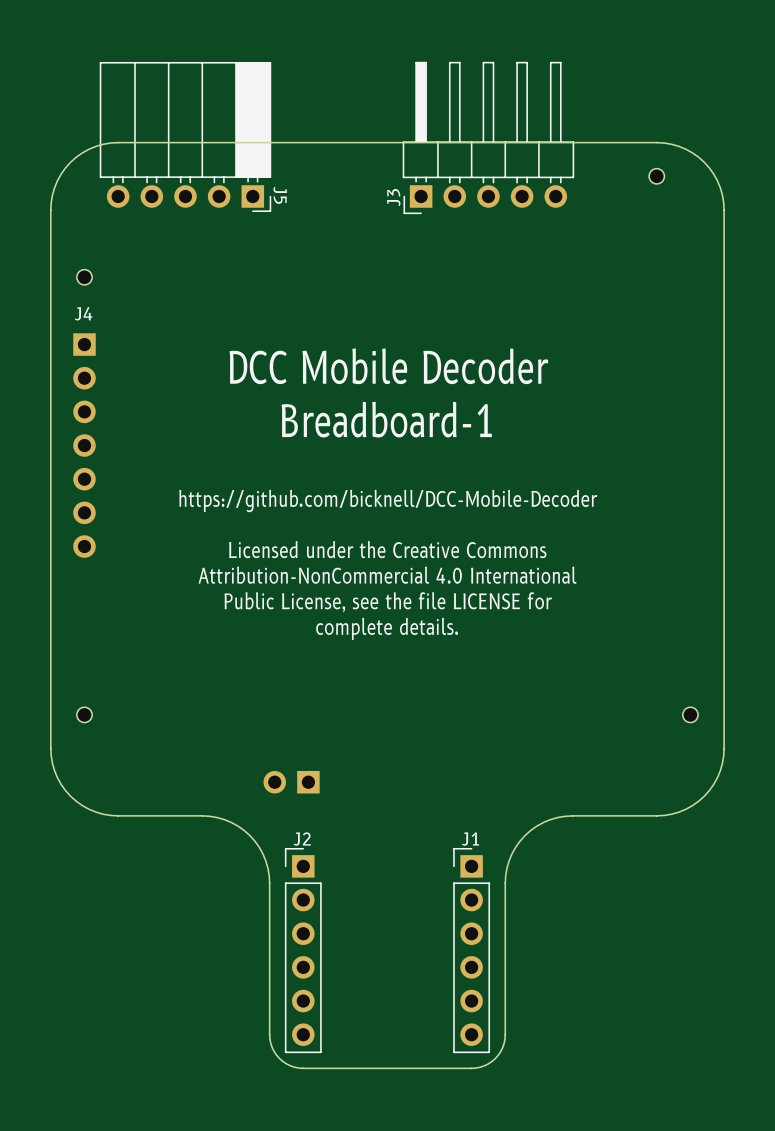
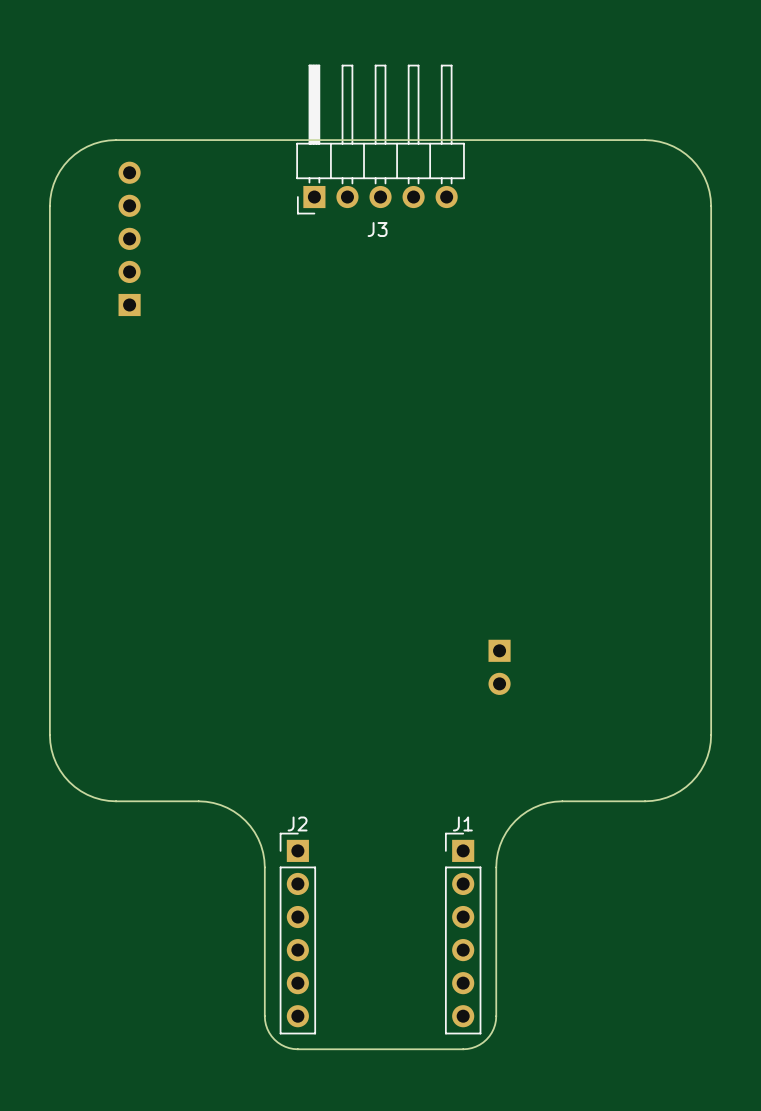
J5 side: bottom (185, 136) -> top (129, 238)
J3 position: (488, 137) -> (380, 139)
part: (656, 176) -> none
J3 name rotation: 0° (393, 197) -> 90° clockwise (377, 229)
J3 name position: J3 (393, 197) -> J3 (377, 229)
part: (84, 277) -> none
text: DCC Mobile Decoder (388, 366) -> none
text: Breadboard-1 (386, 419) -> none
J4: (84, 445) -> none
text: https://github.com/bicknell/DCC-Mobile-Decoder (388, 500) -> none
text: Licensed under the Creative Commons (387, 549) -> none
text: Attribution-NonCommercial 4.0 International (387, 575) -> none
text: Public License, see the file LICENSE for (388, 602) -> none
text: complete details. (387, 628) -> none
part: (84, 714) -> none
part: (690, 714) -> none
part rotation: 0° (291, 782) -> 90° counterclockwise (499, 667)
part position: (291, 782) -> (499, 667)

